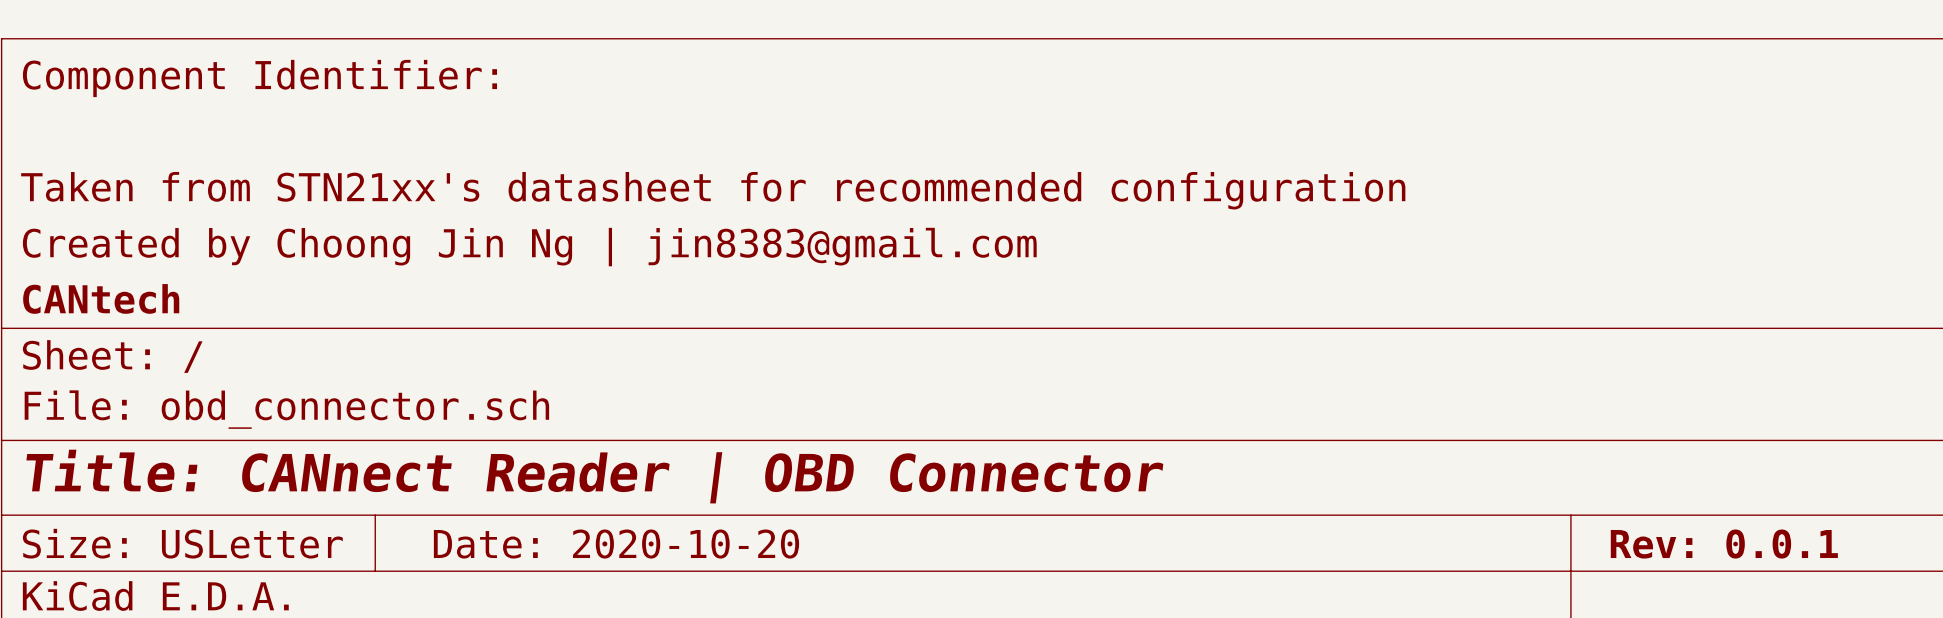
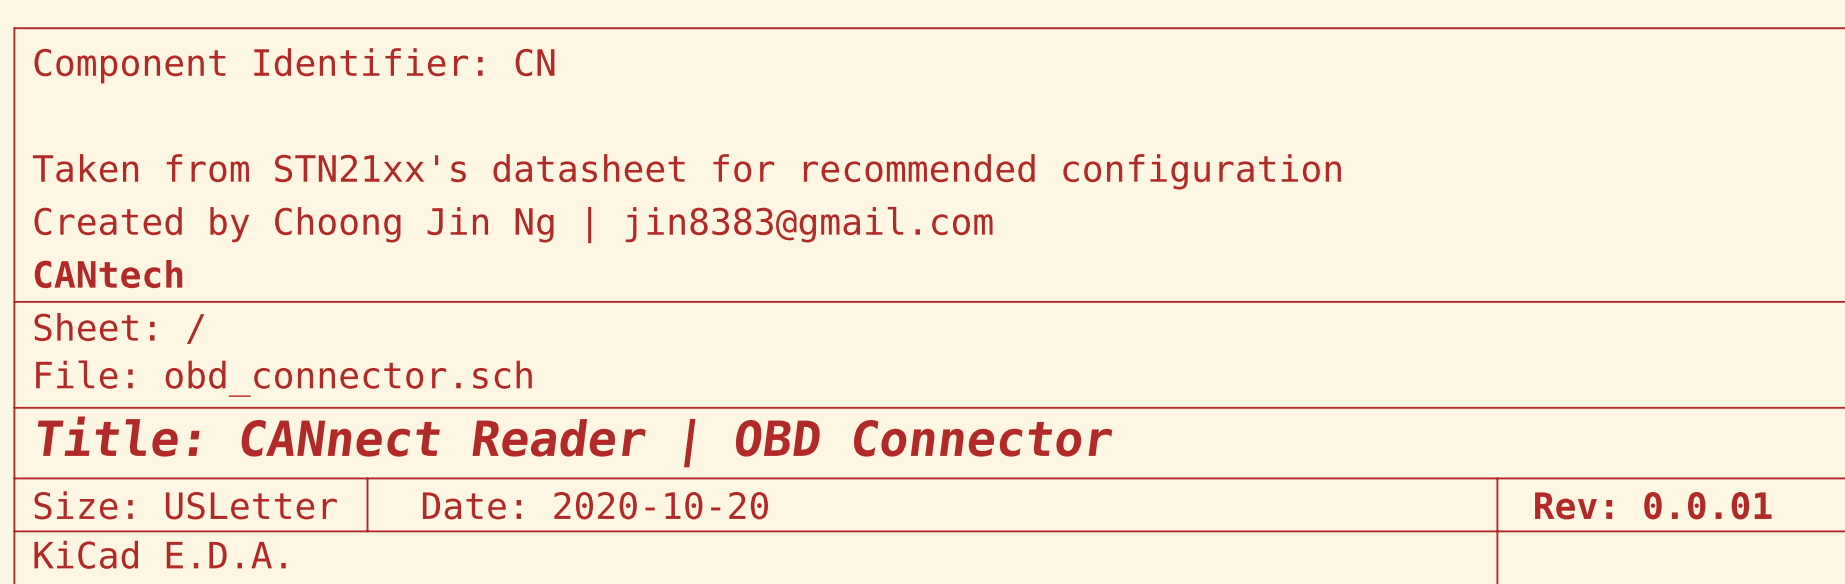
title block: Component Identifier: (259, 78) -> Component Identifier: CN (294, 65)
title block: Rev: 0.0.1 (1724, 544) -> Rev: 0.0.01 (1653, 505)

